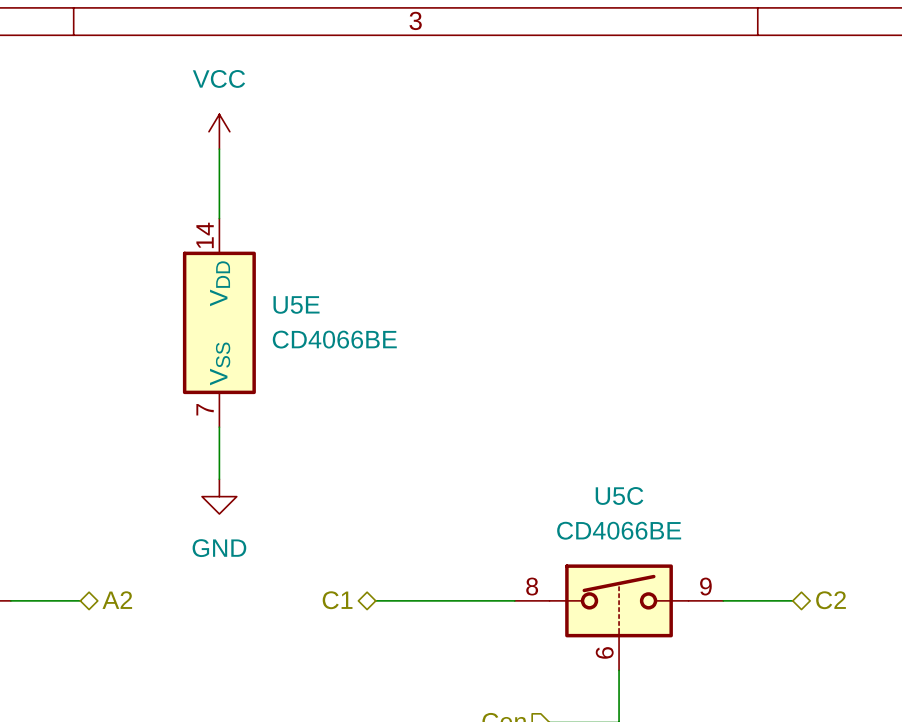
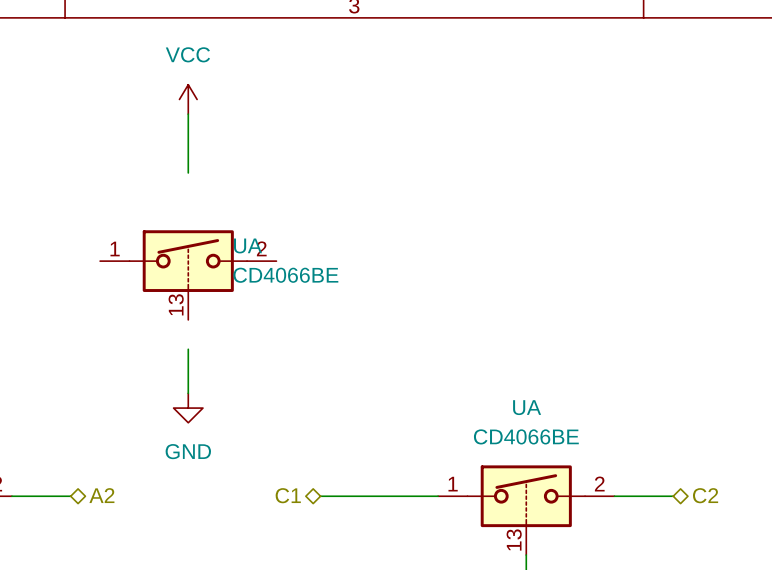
U5E: CD4066BE (219, 322) -> none
UA: none -> CD4066BE (188, 275)
U5C name: U5C (619, 495) -> UA (527, 407)
U5C pin number: 8 (532, 586) -> 1 (453, 484)
U5C pin number: 9 (705, 586) -> 2 (599, 484)
U5C pin number: 6 (604, 652) -> 13 (514, 539)

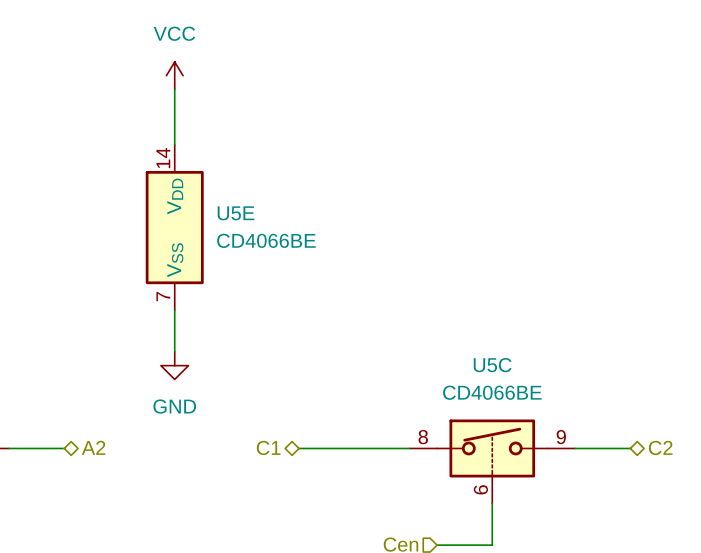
U5E: none -> CD4066BE (174, 227)
UA: CD4066BE (188, 275) -> none
UA name: UA (527, 407) -> U5C (492, 365)
UA pin number: 1 (453, 484) -> 8 (423, 437)
UA pin number: 2 (599, 484) -> 9 (561, 437)
UA pin number: 13 (514, 539) -> 6 (480, 489)

